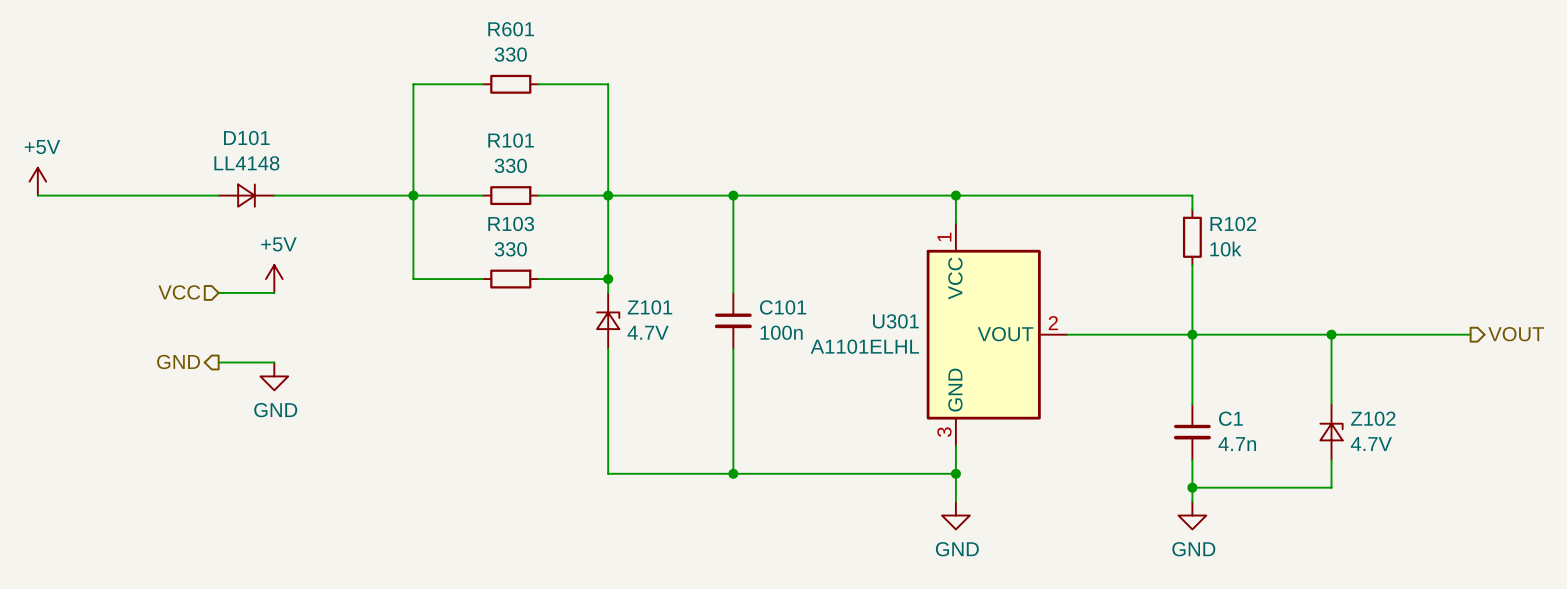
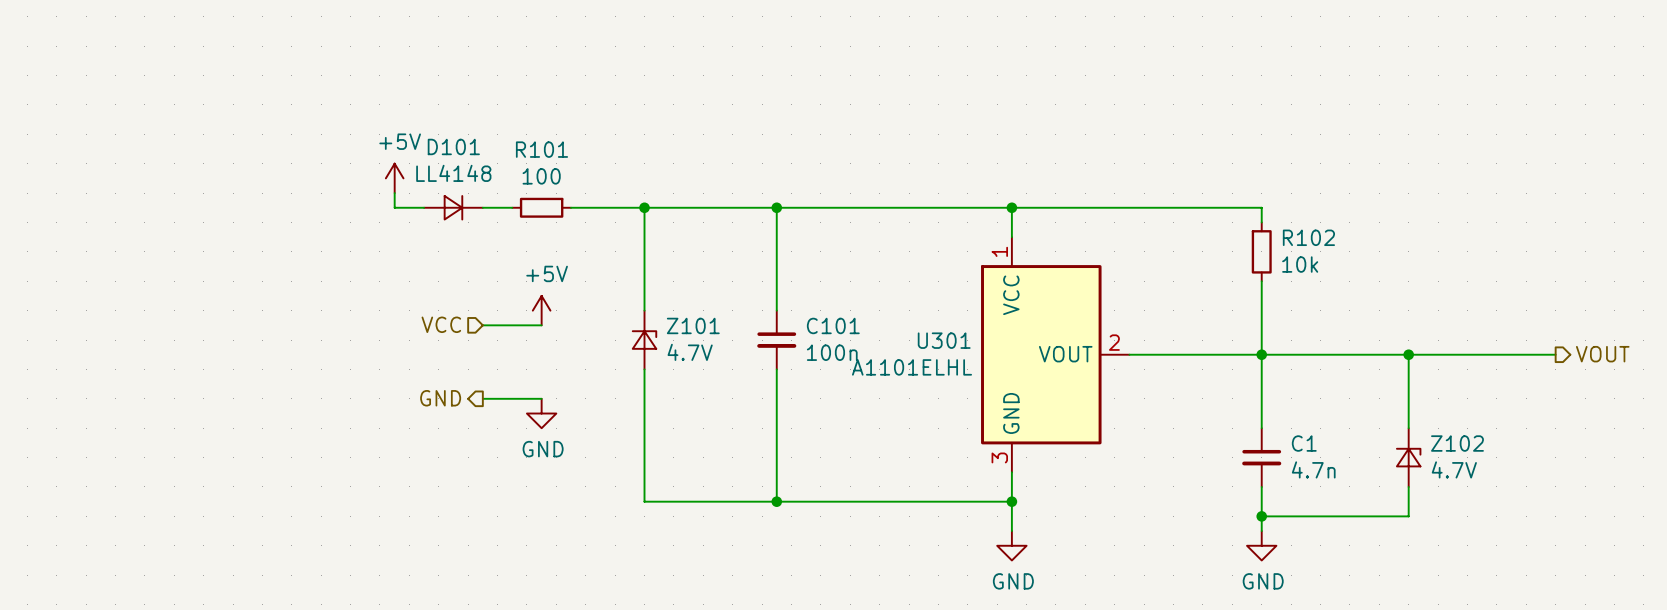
wire: (482, 84) (413, 84) (413, 279) (482, 279) -> none
R601: 330 (510, 84) -> none
wire: (538, 84) (608, 84) (608, 195) -> none
R101 value: 330 (510, 165) -> 100 (541, 176)
power symbol: none -> +5V (394, 178)
power symbol: +5V (37, 181) -> none
wire: (37, 195) (218, 195) -> none
D101 position: (246, 195) -> (453, 207)
wire: (274, 195) (371, 195) -> (394, 193) (394, 207)
junction: (413, 195) -> none
power symbol: +5V (274, 279) -> none
R103: 330 (510, 279) -> none
wire: (538, 279) (608, 279) -> none
junction: (608, 279) -> none
hierarchical label position: VCC (179, 292) -> VCC (441, 324)
wire: (218, 292) (274, 292) -> (482, 325) (541, 325)
power symbol: none -> +5V (541, 310)
hierarchical label position: GND (178, 361) -> GND (440, 398)
wire: (218, 362) (274, 362) -> (482, 398) (541, 398)
power symbol position: GND (274, 376) -> GND (541, 413)

